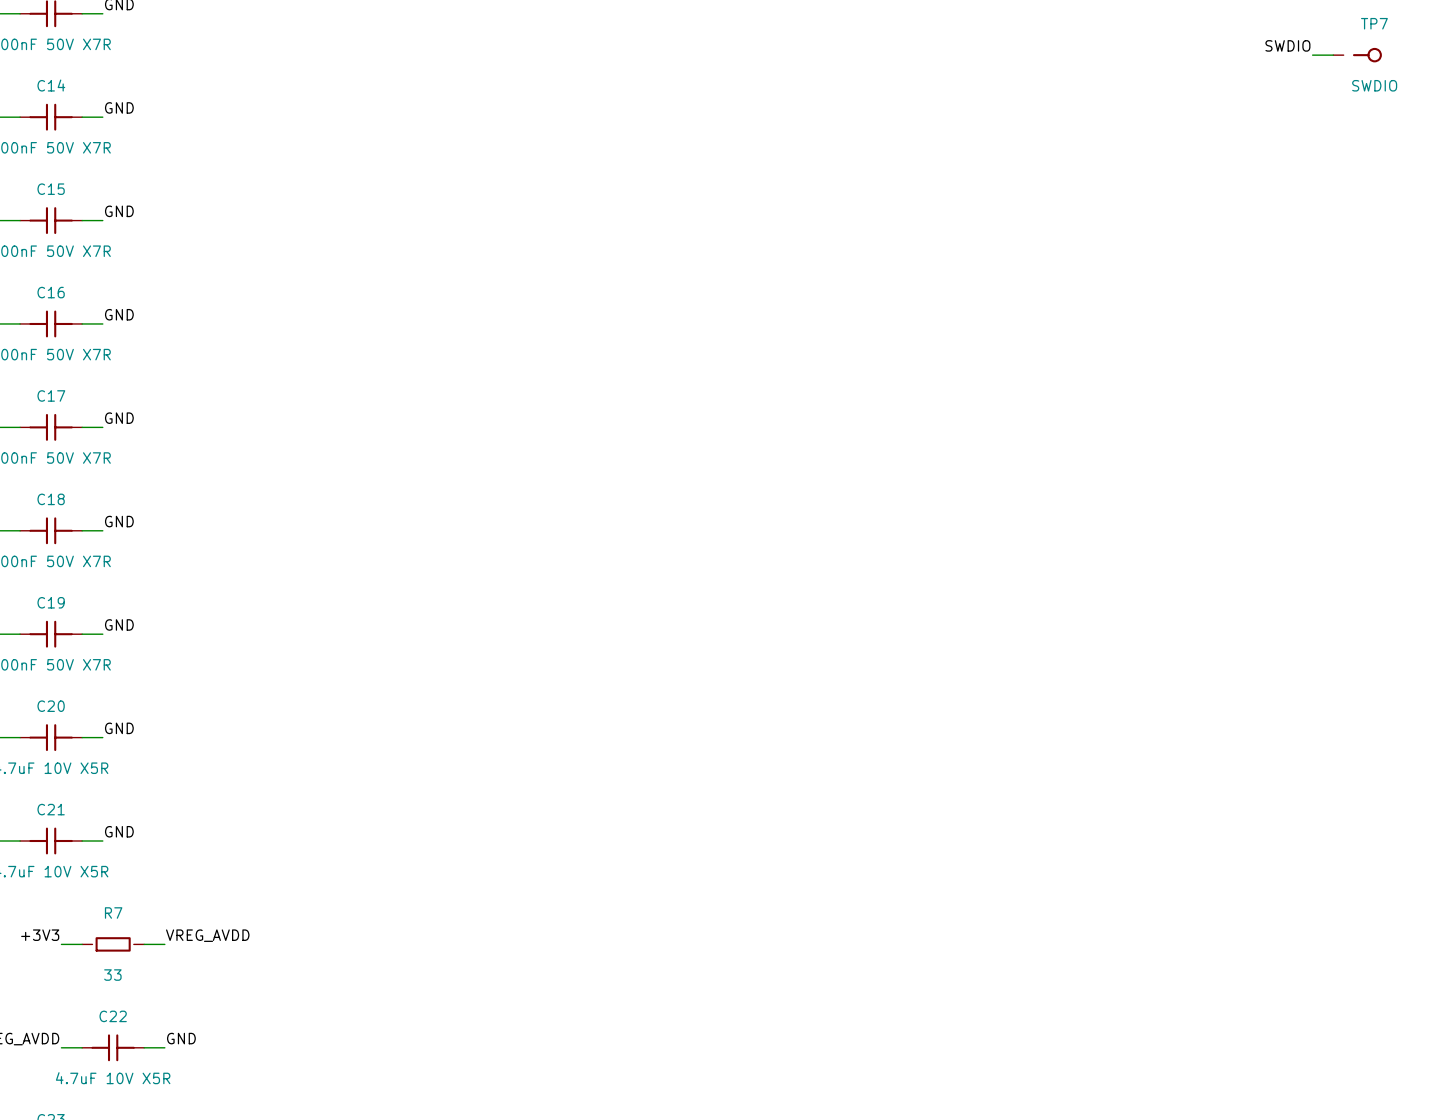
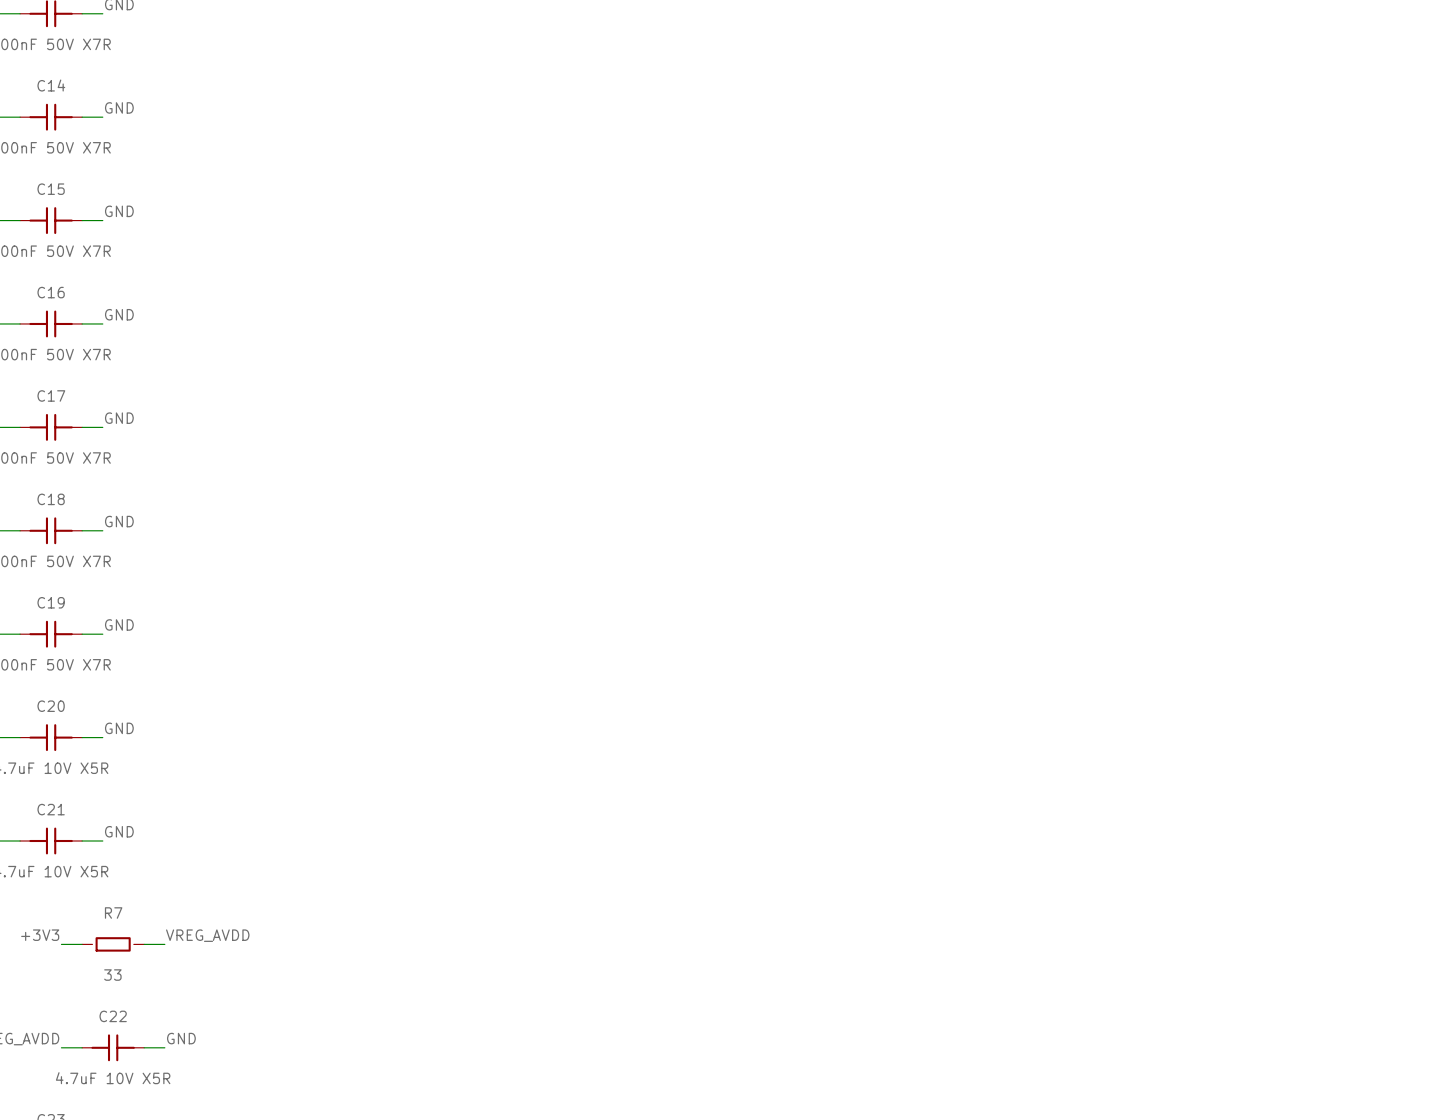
label: SWDIO (1287, 45) -> none
wire: (1312, 55) (1333, 55) -> none
TP7: SWDIO (1357, 55) -> none

